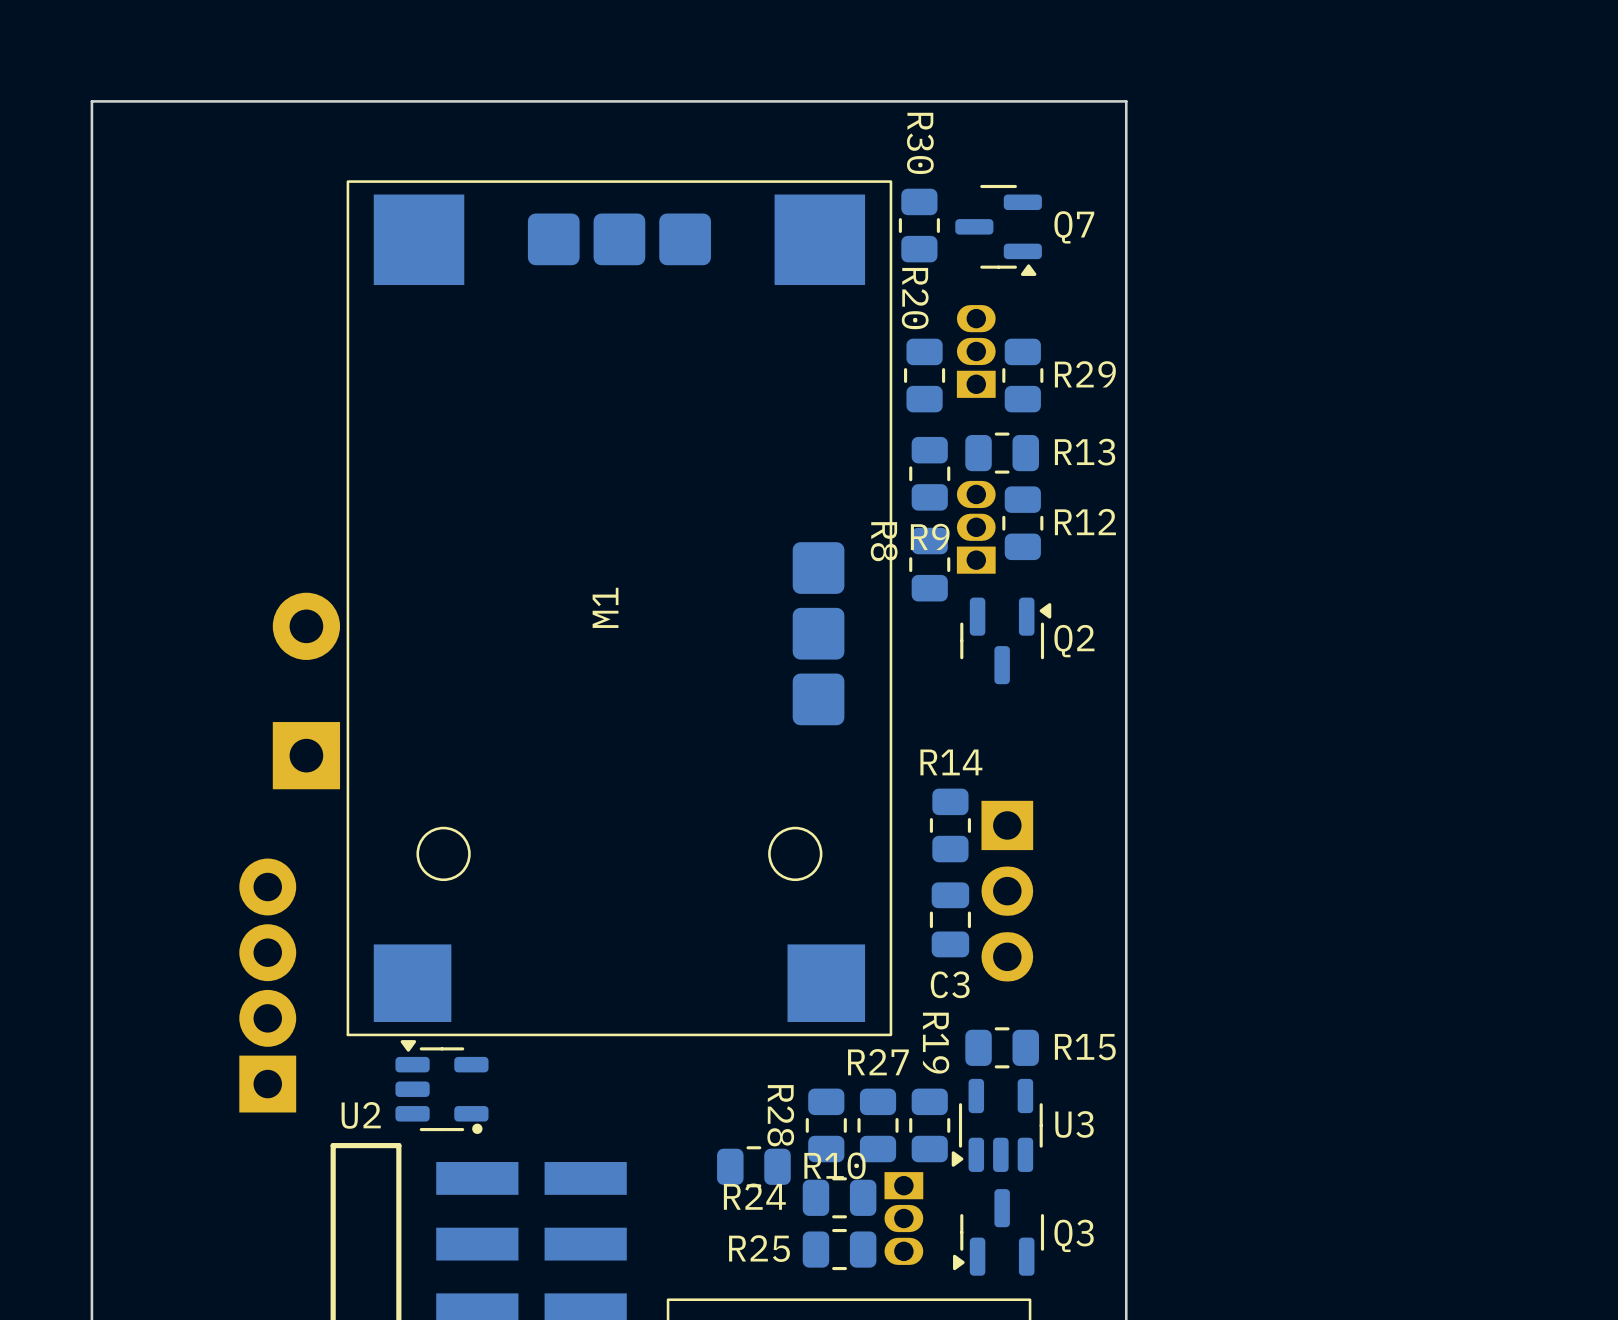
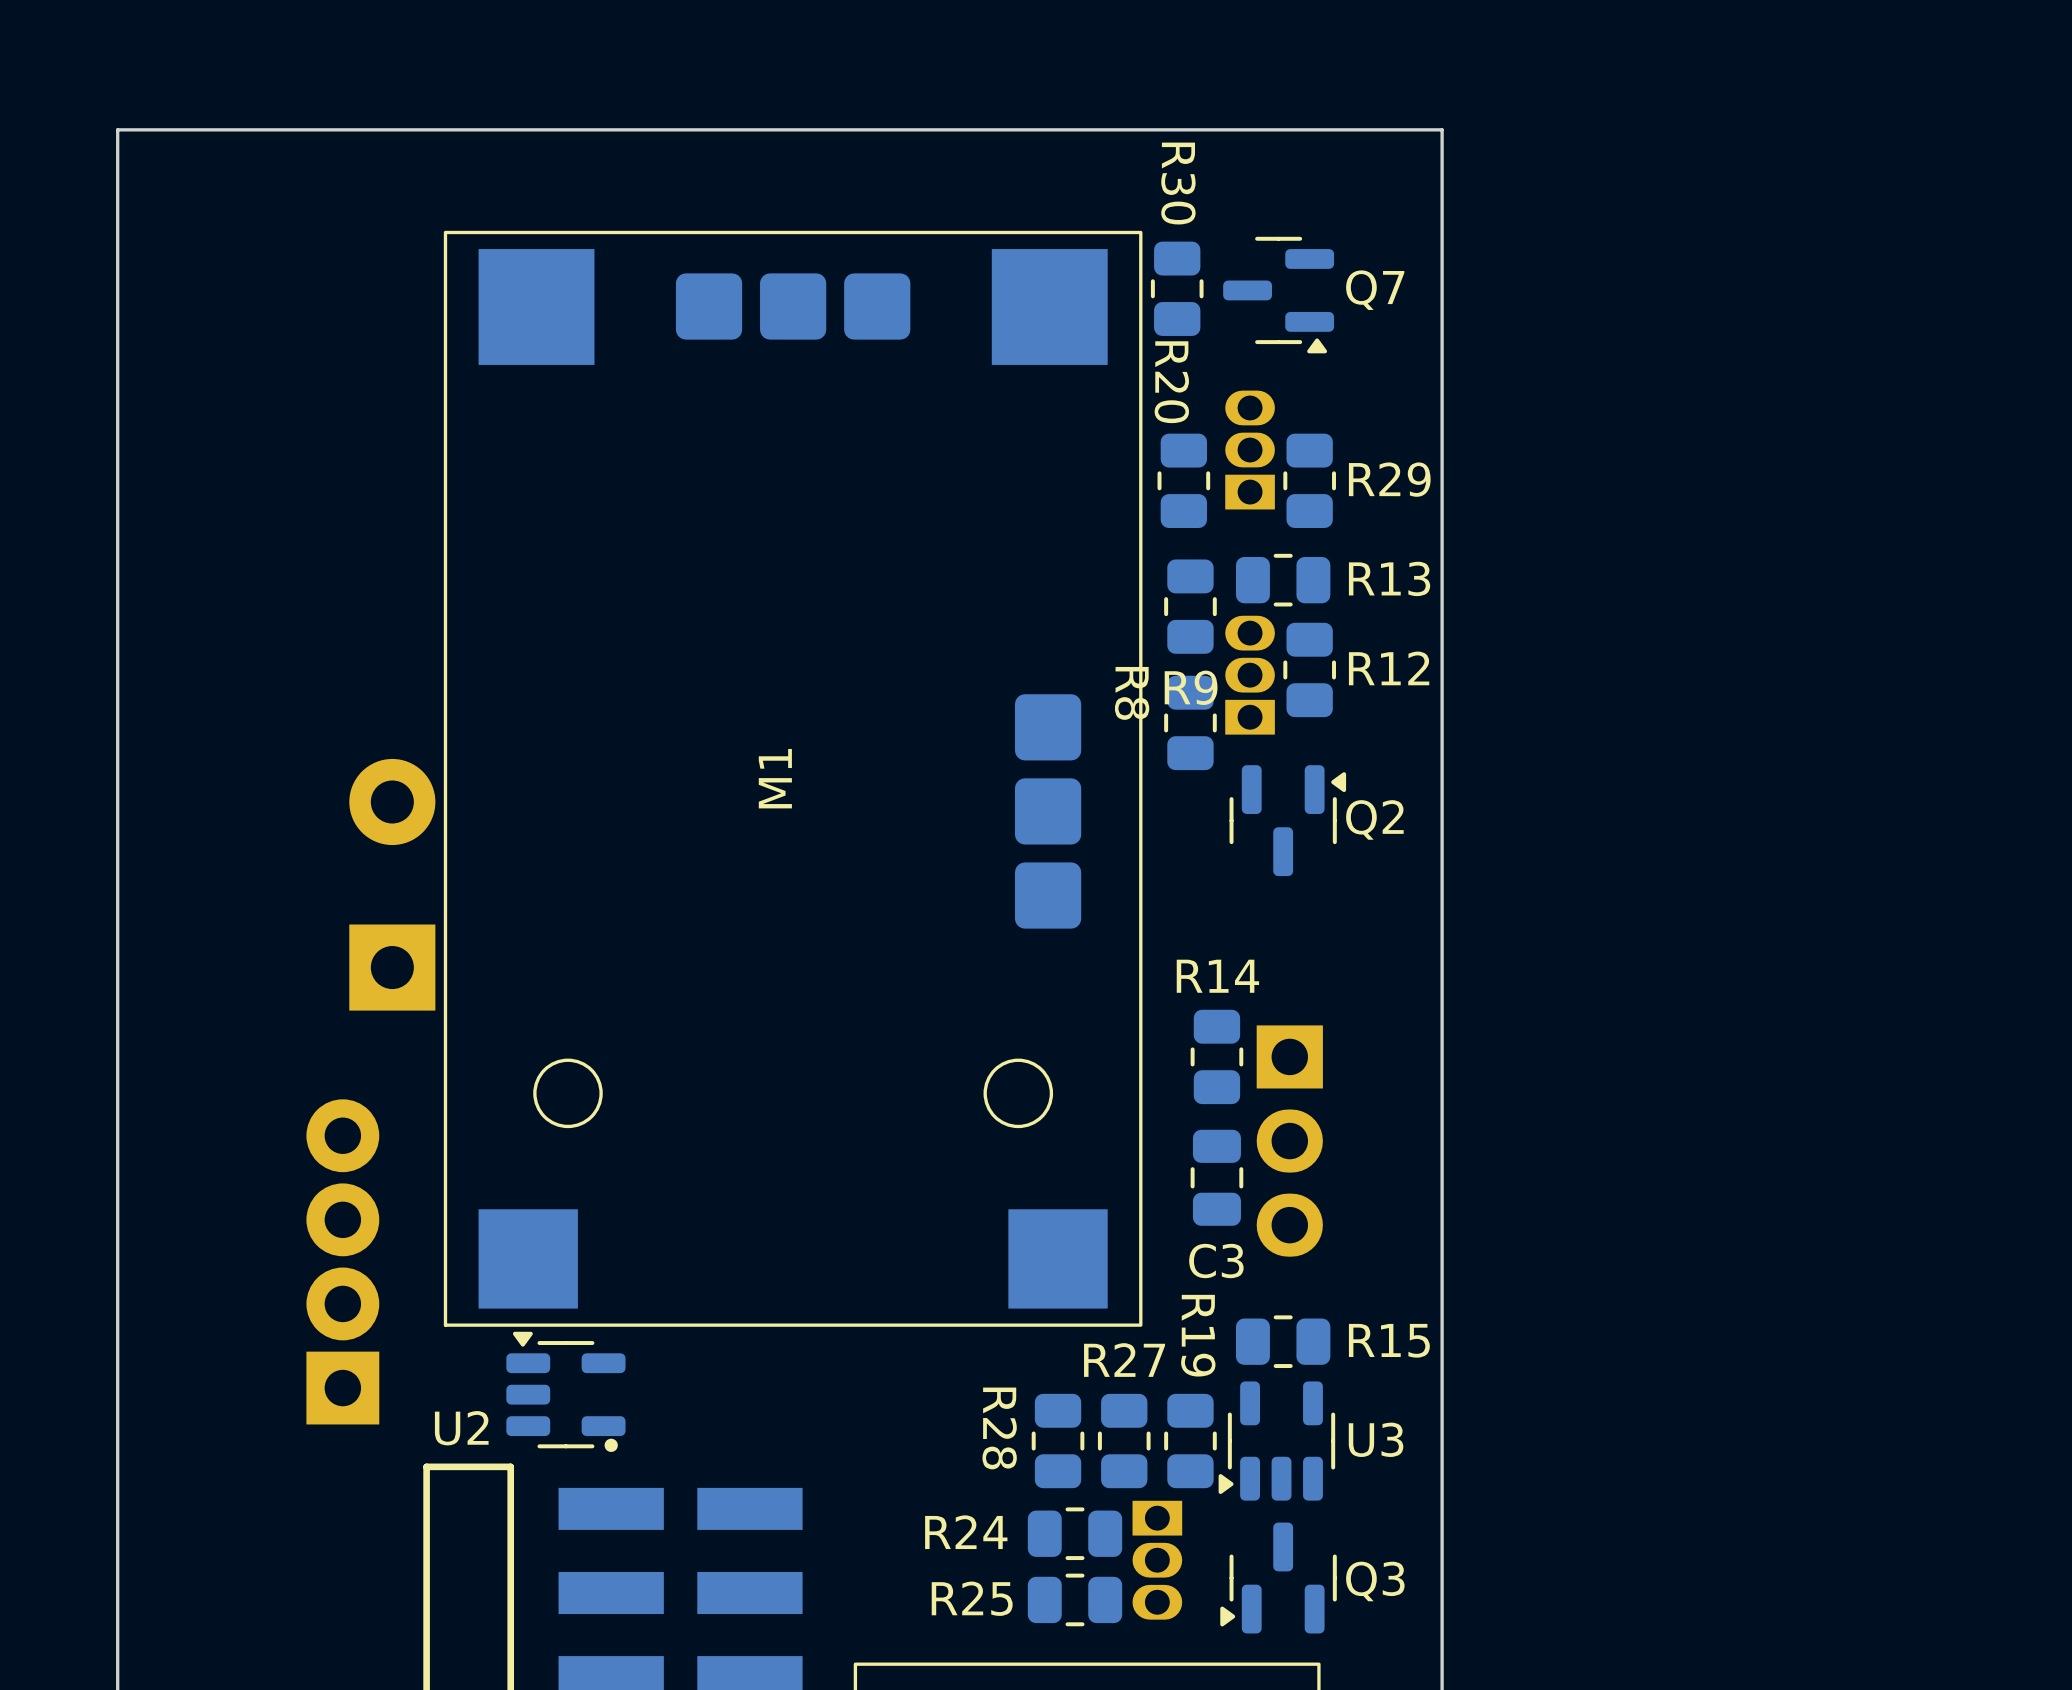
R10: (753, 1166) -> none

